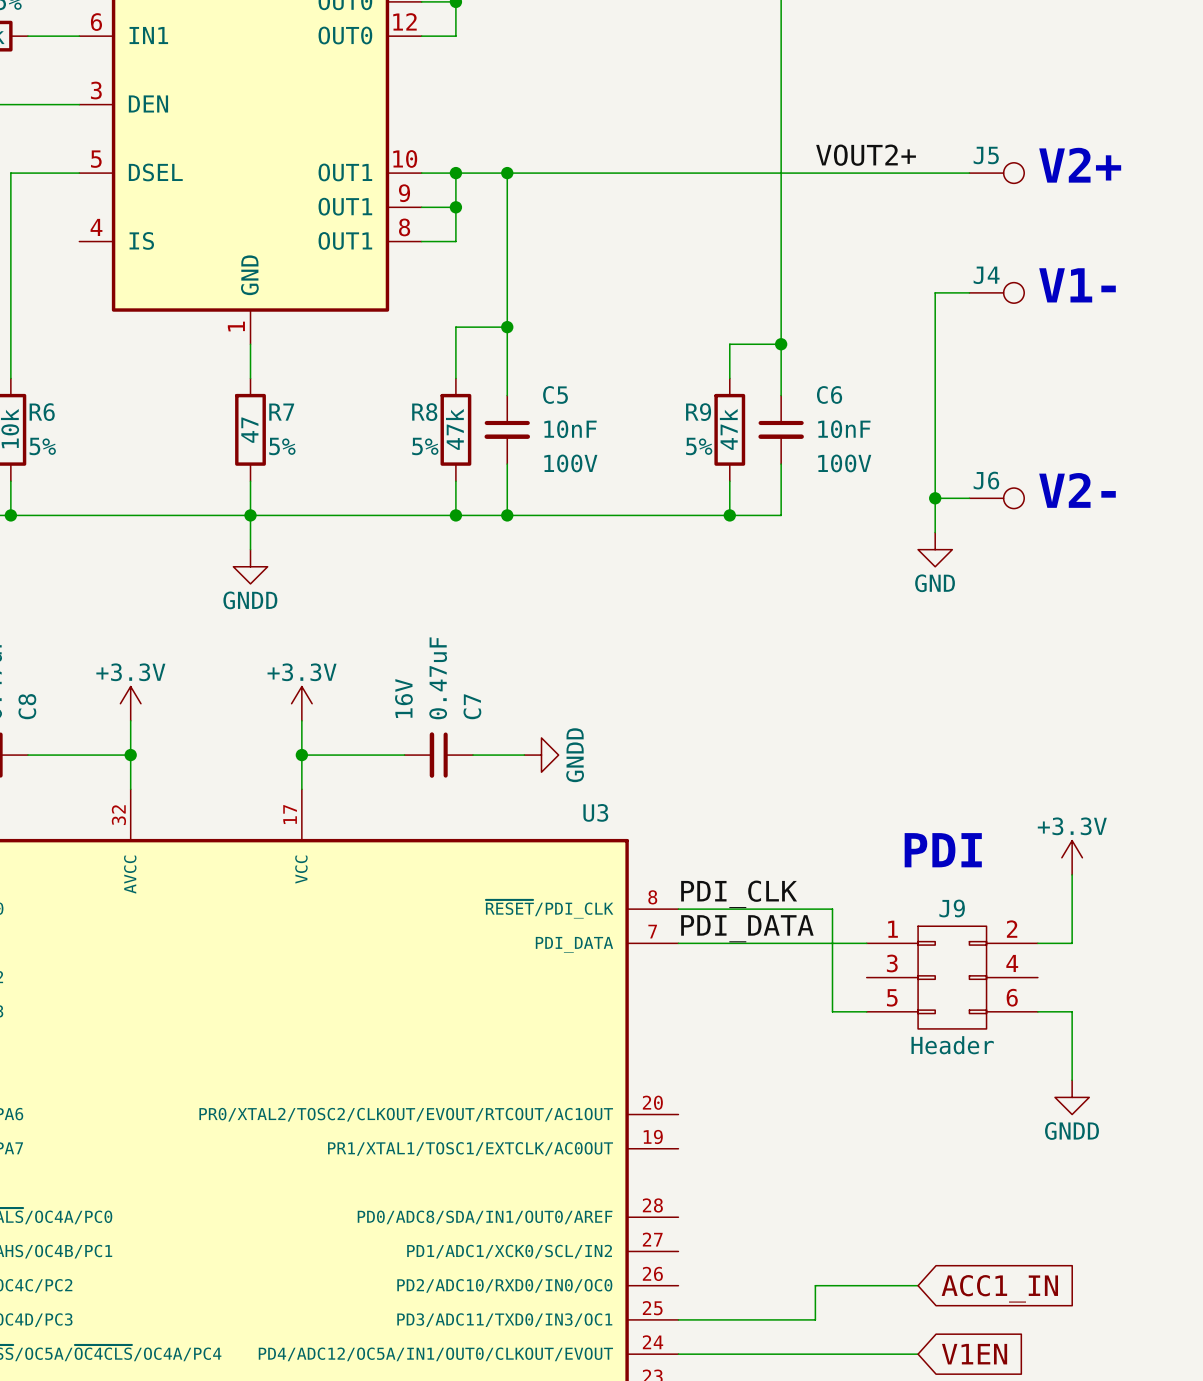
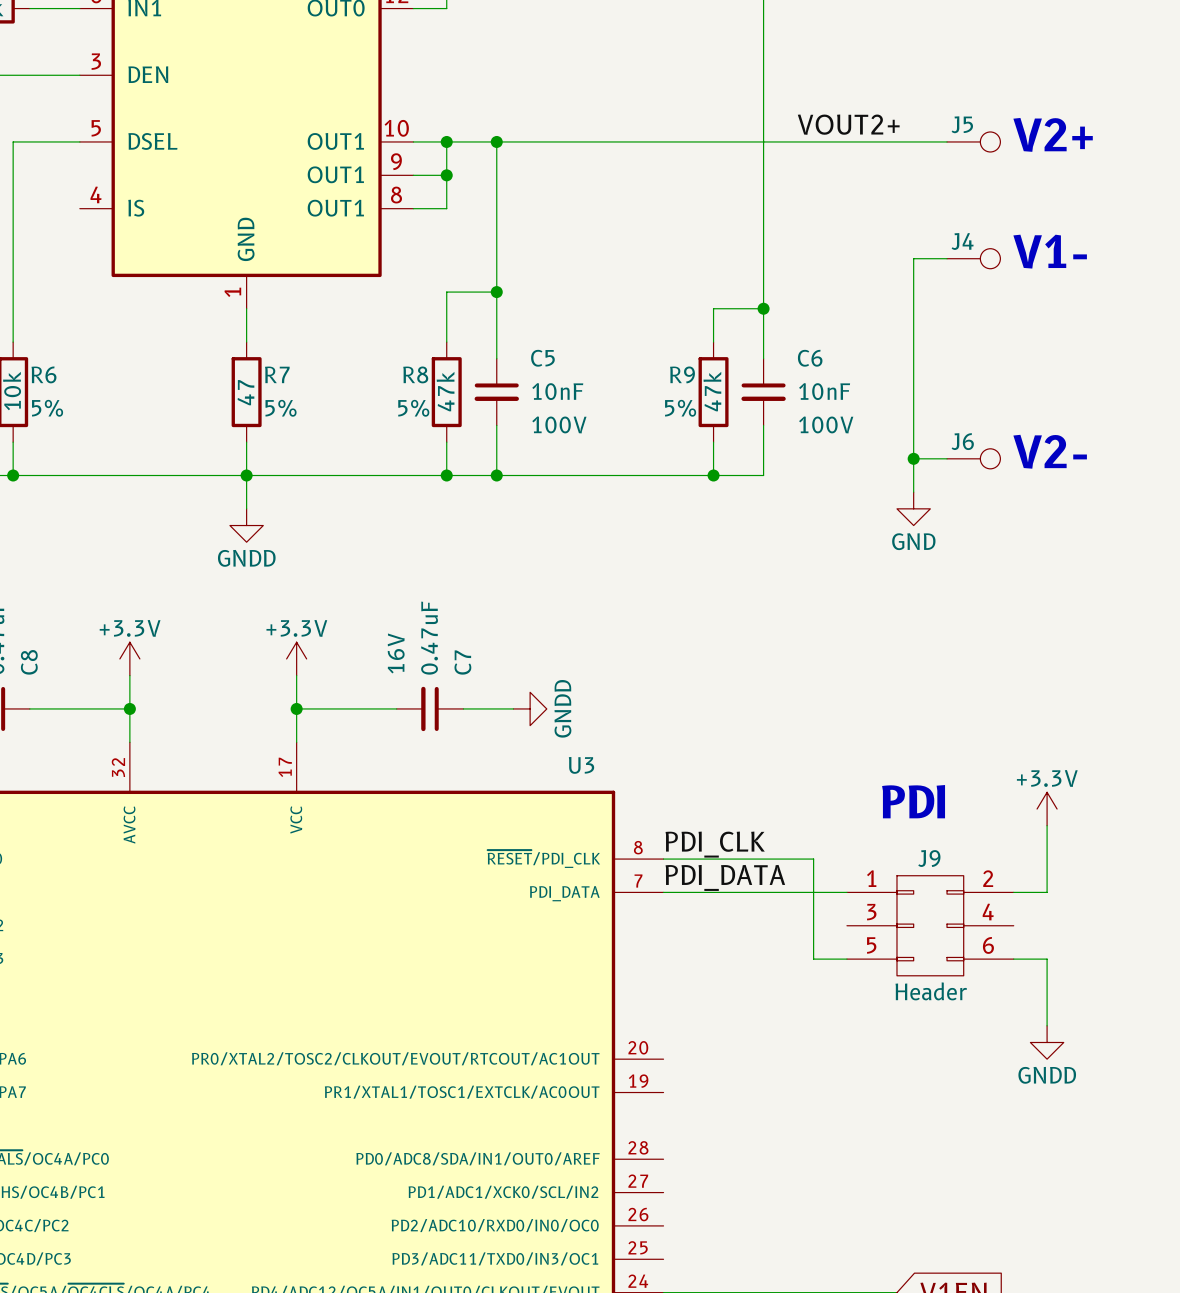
wire: (918, 1285) (815, 1285) (815, 1319) (678, 1319) -> none
global label: ACC1_IN (999, 1288) -> none

